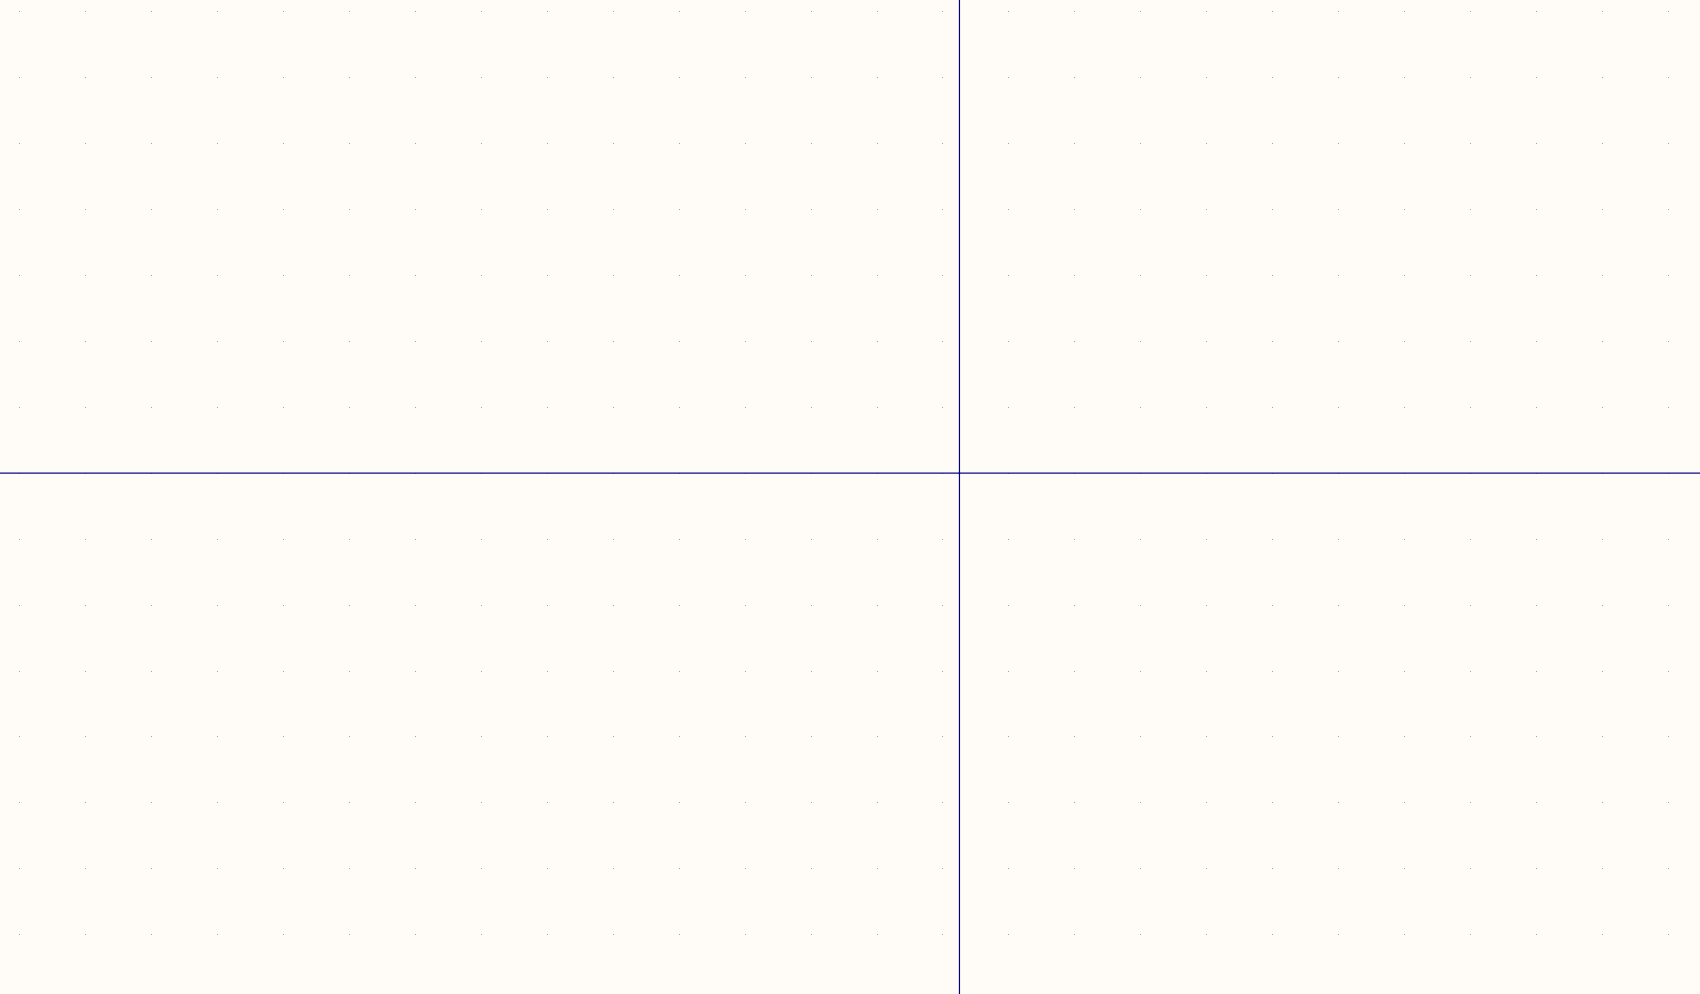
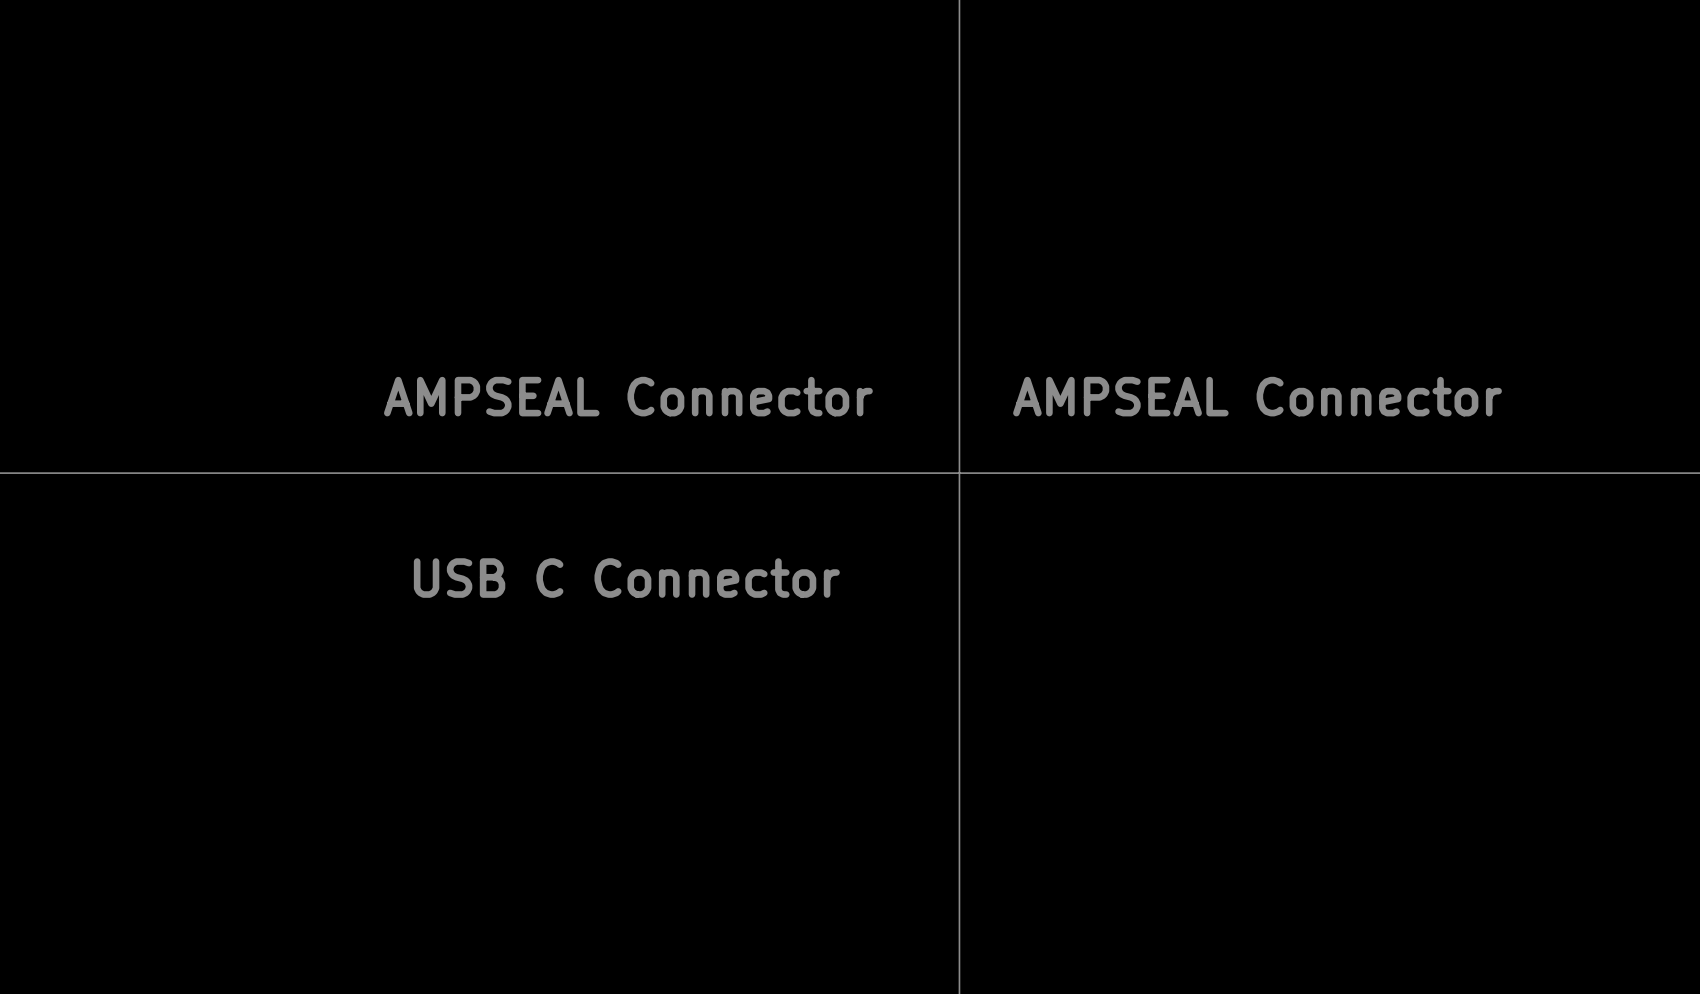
text: none -> AMPSEAL Connector (628, 396)
text: none -> AMPSEAL Connector (1257, 396)
text: none -> USB C Connector (626, 578)

